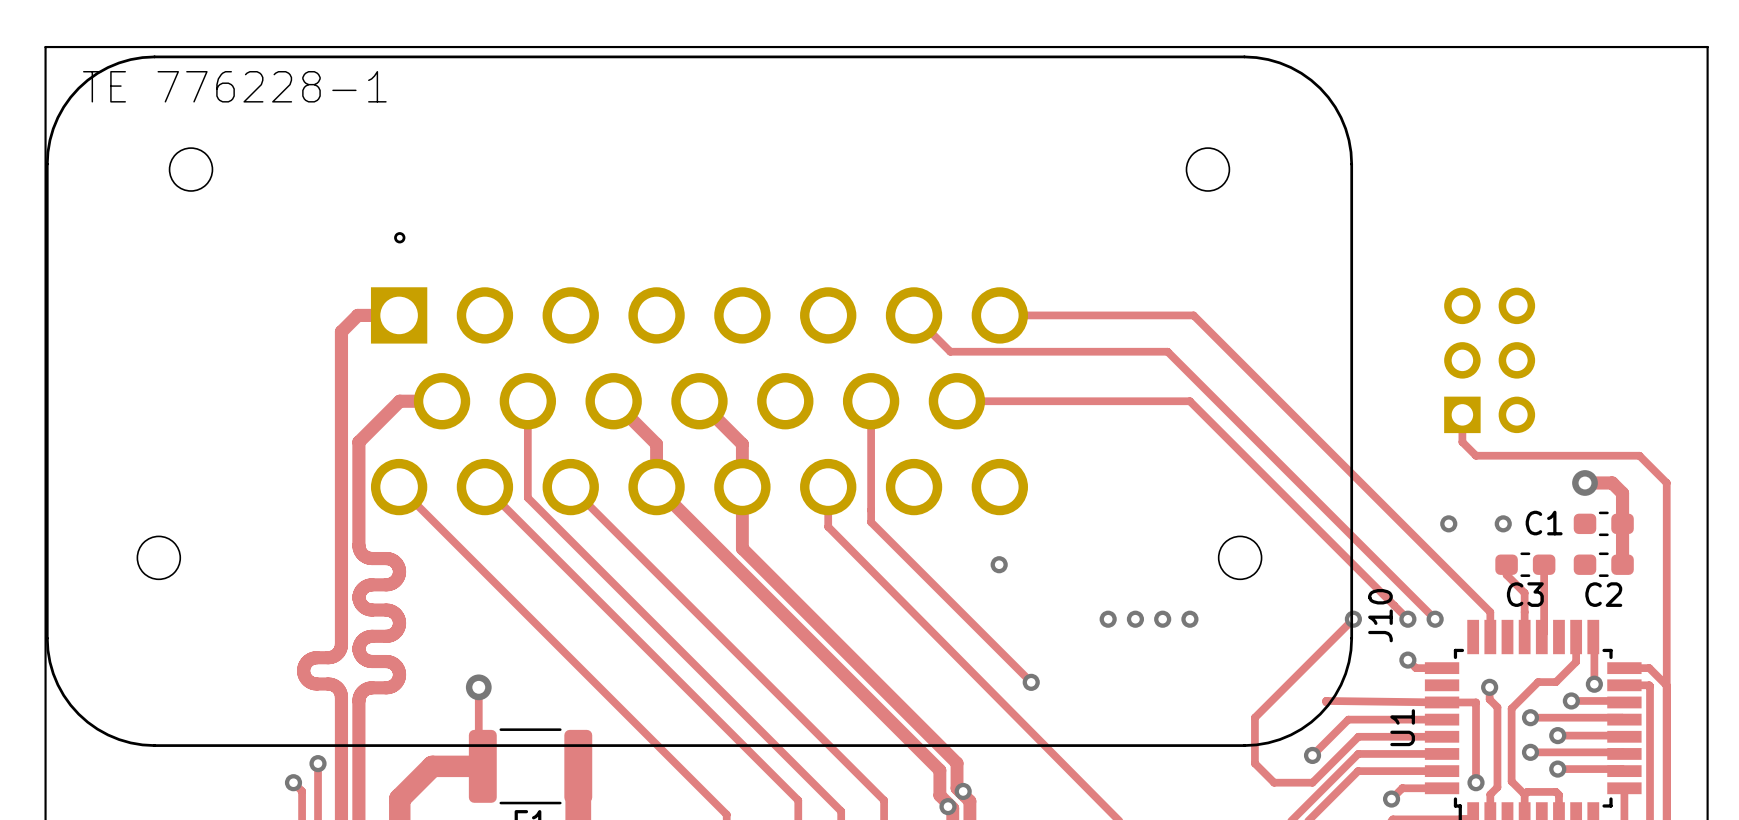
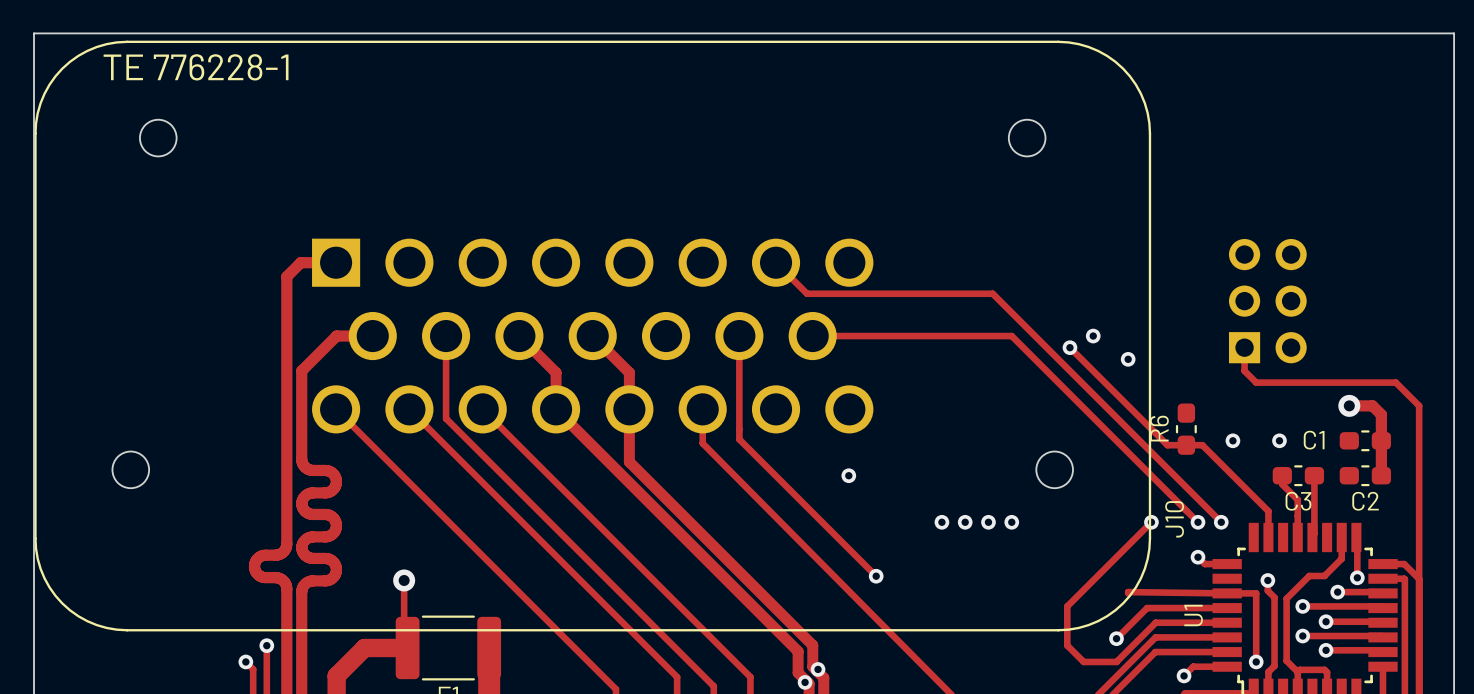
J10 footprint: [45, 55, 1354, 747] -> [34, 40, 1152, 632]
track: (999, 315) (1193, 315) (1490, 612) -> (1069, 347) (1167, 445) (1202, 445) (1268, 511) (1268, 516)
via: none -> (1093, 336)
via: none -> (1069, 347)
via: none -> (1128, 359)
R6: none -> (1186, 429)

